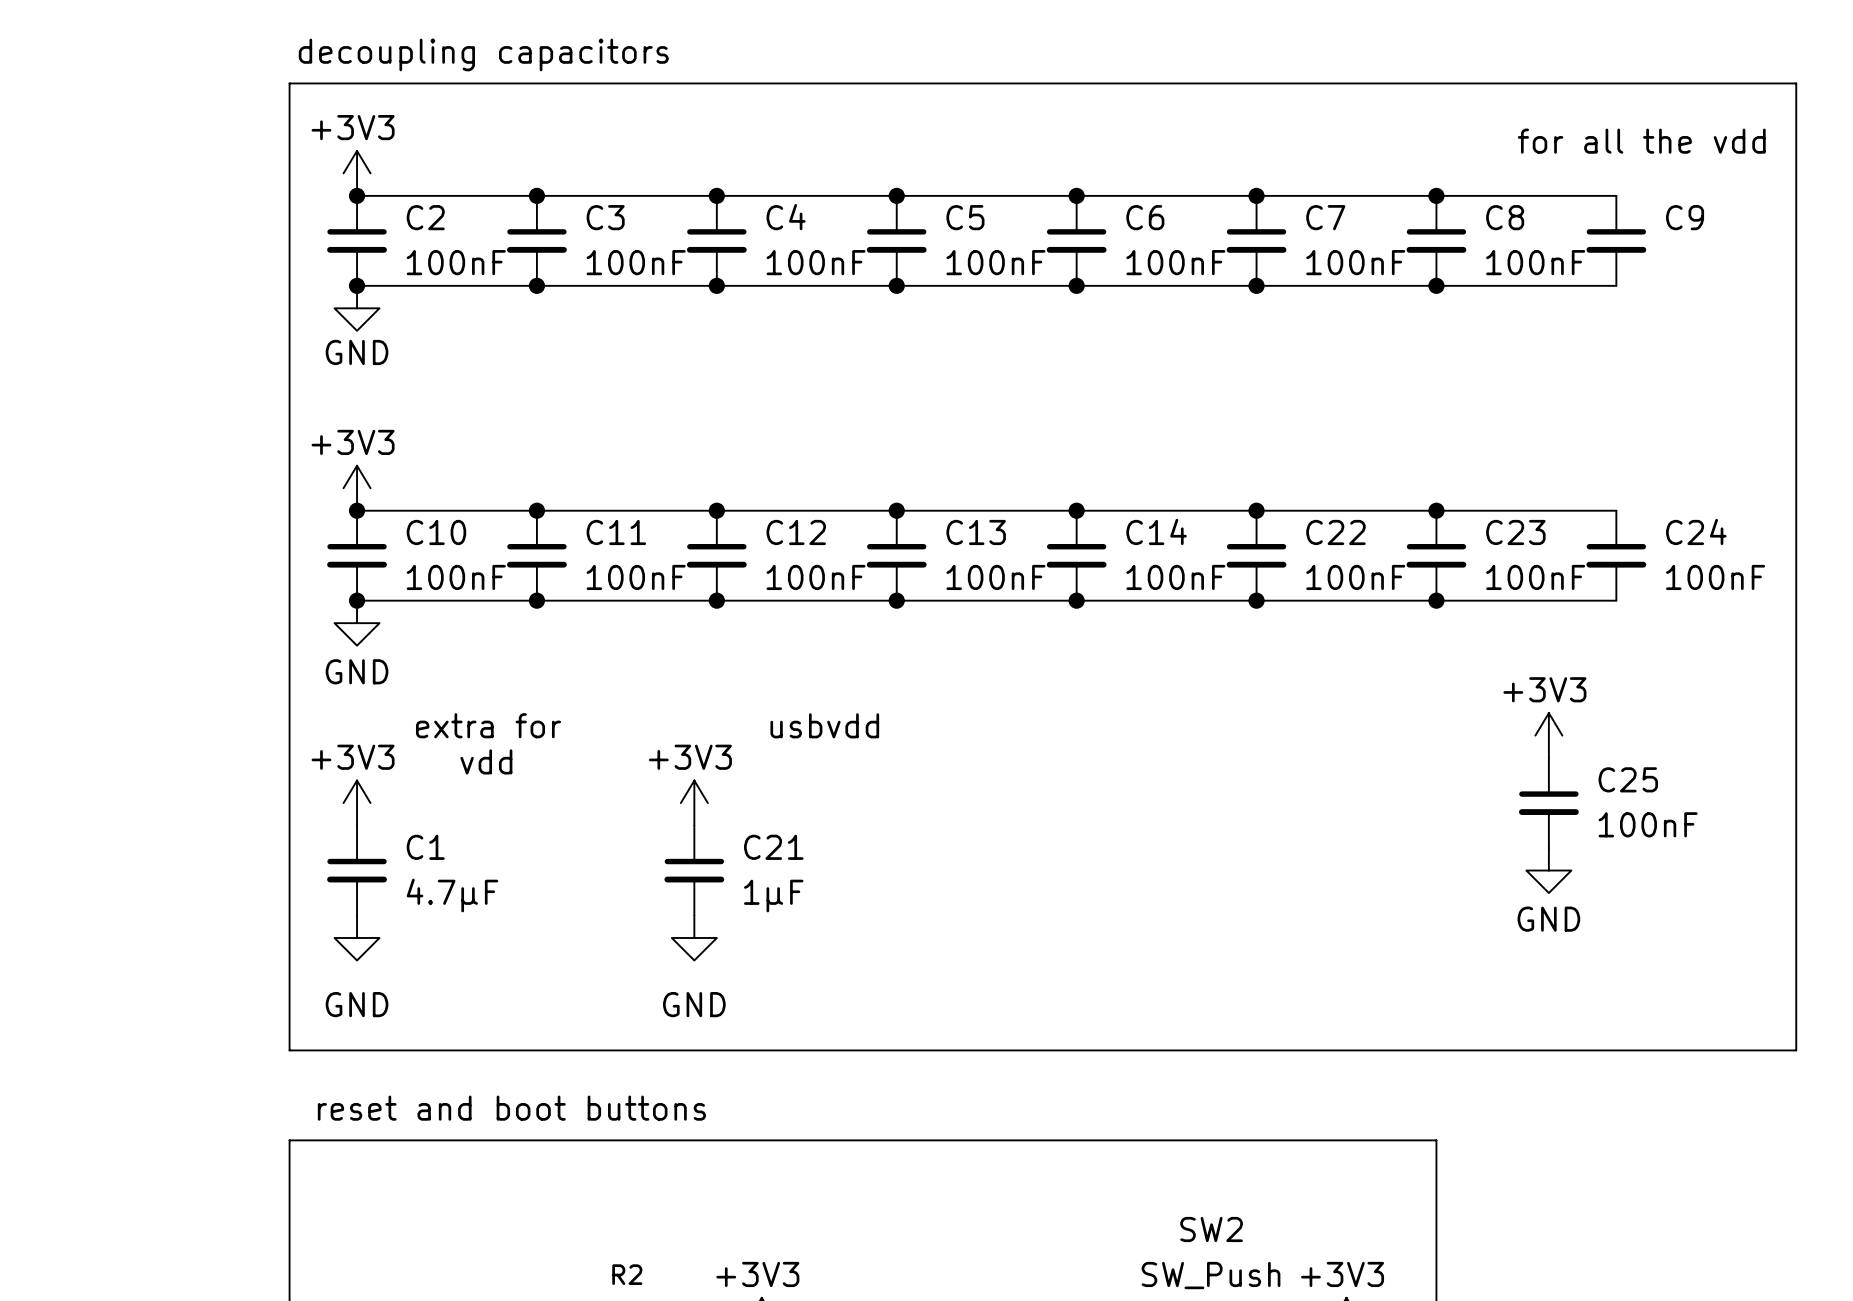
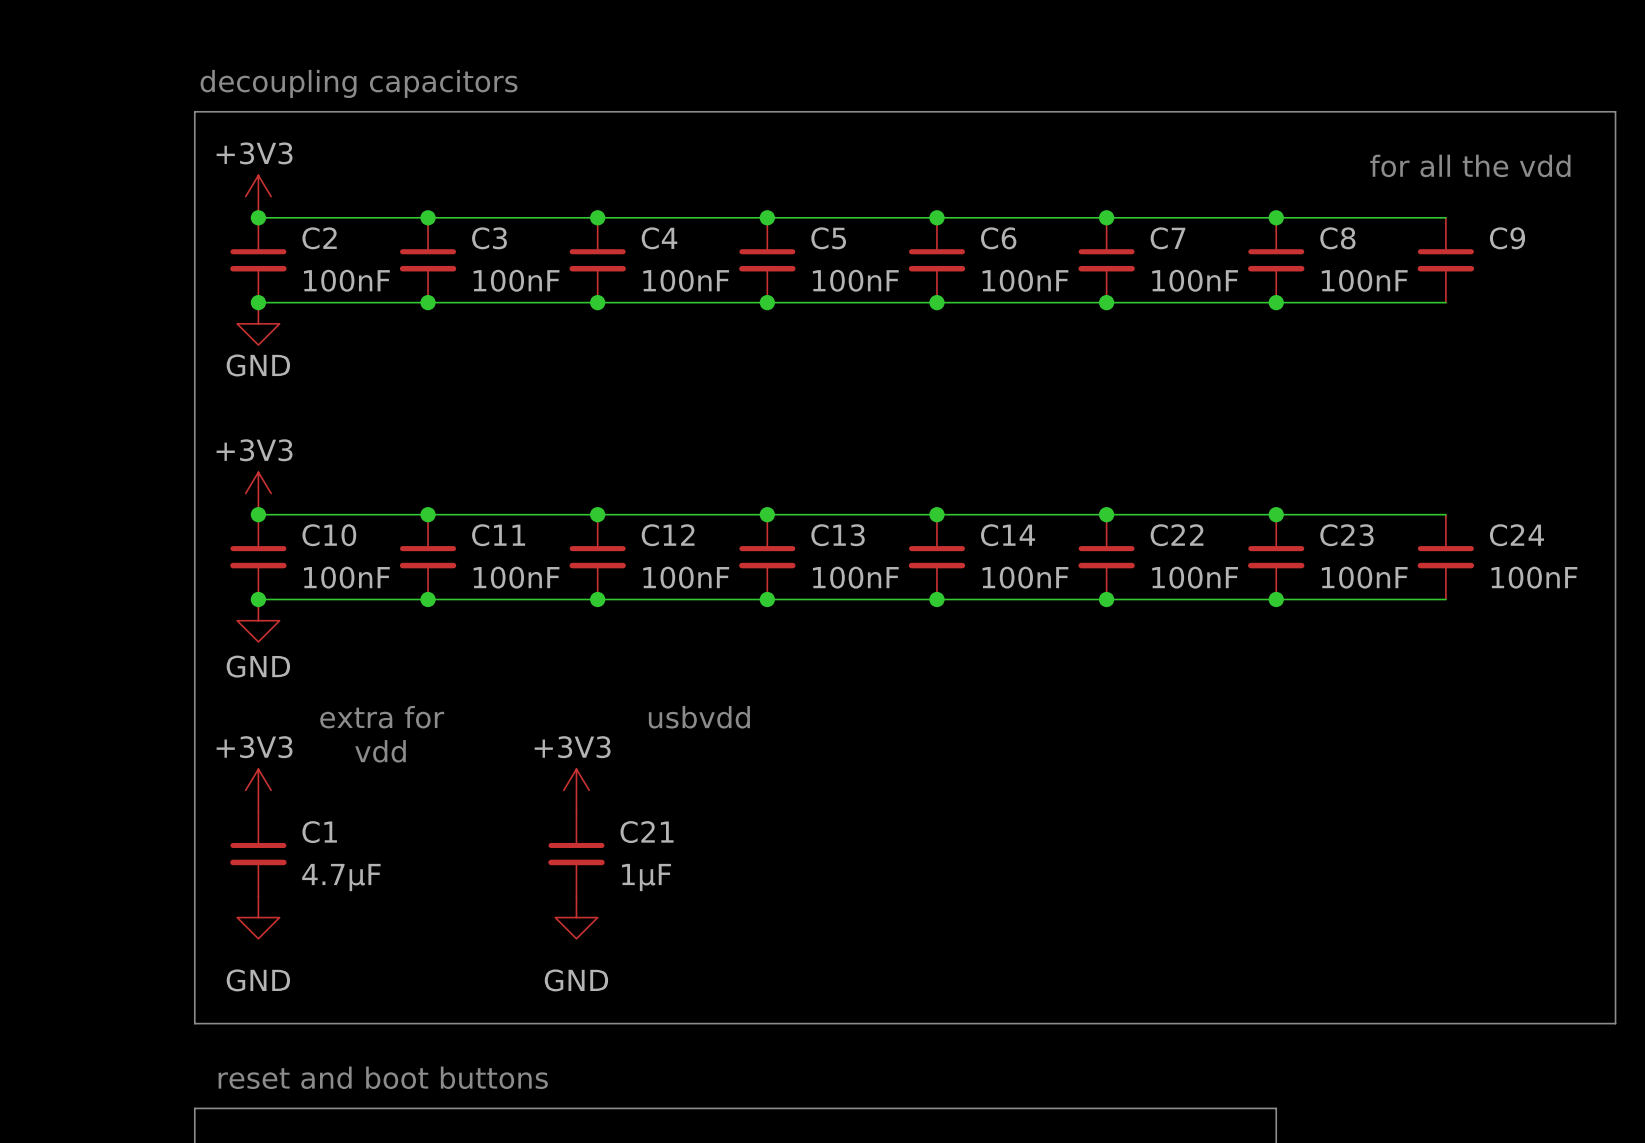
power symbol: +3V3 (1548, 735) -> none
C25: 100nF (1548, 803) -> none
power symbol: GND (1548, 870) -> none

